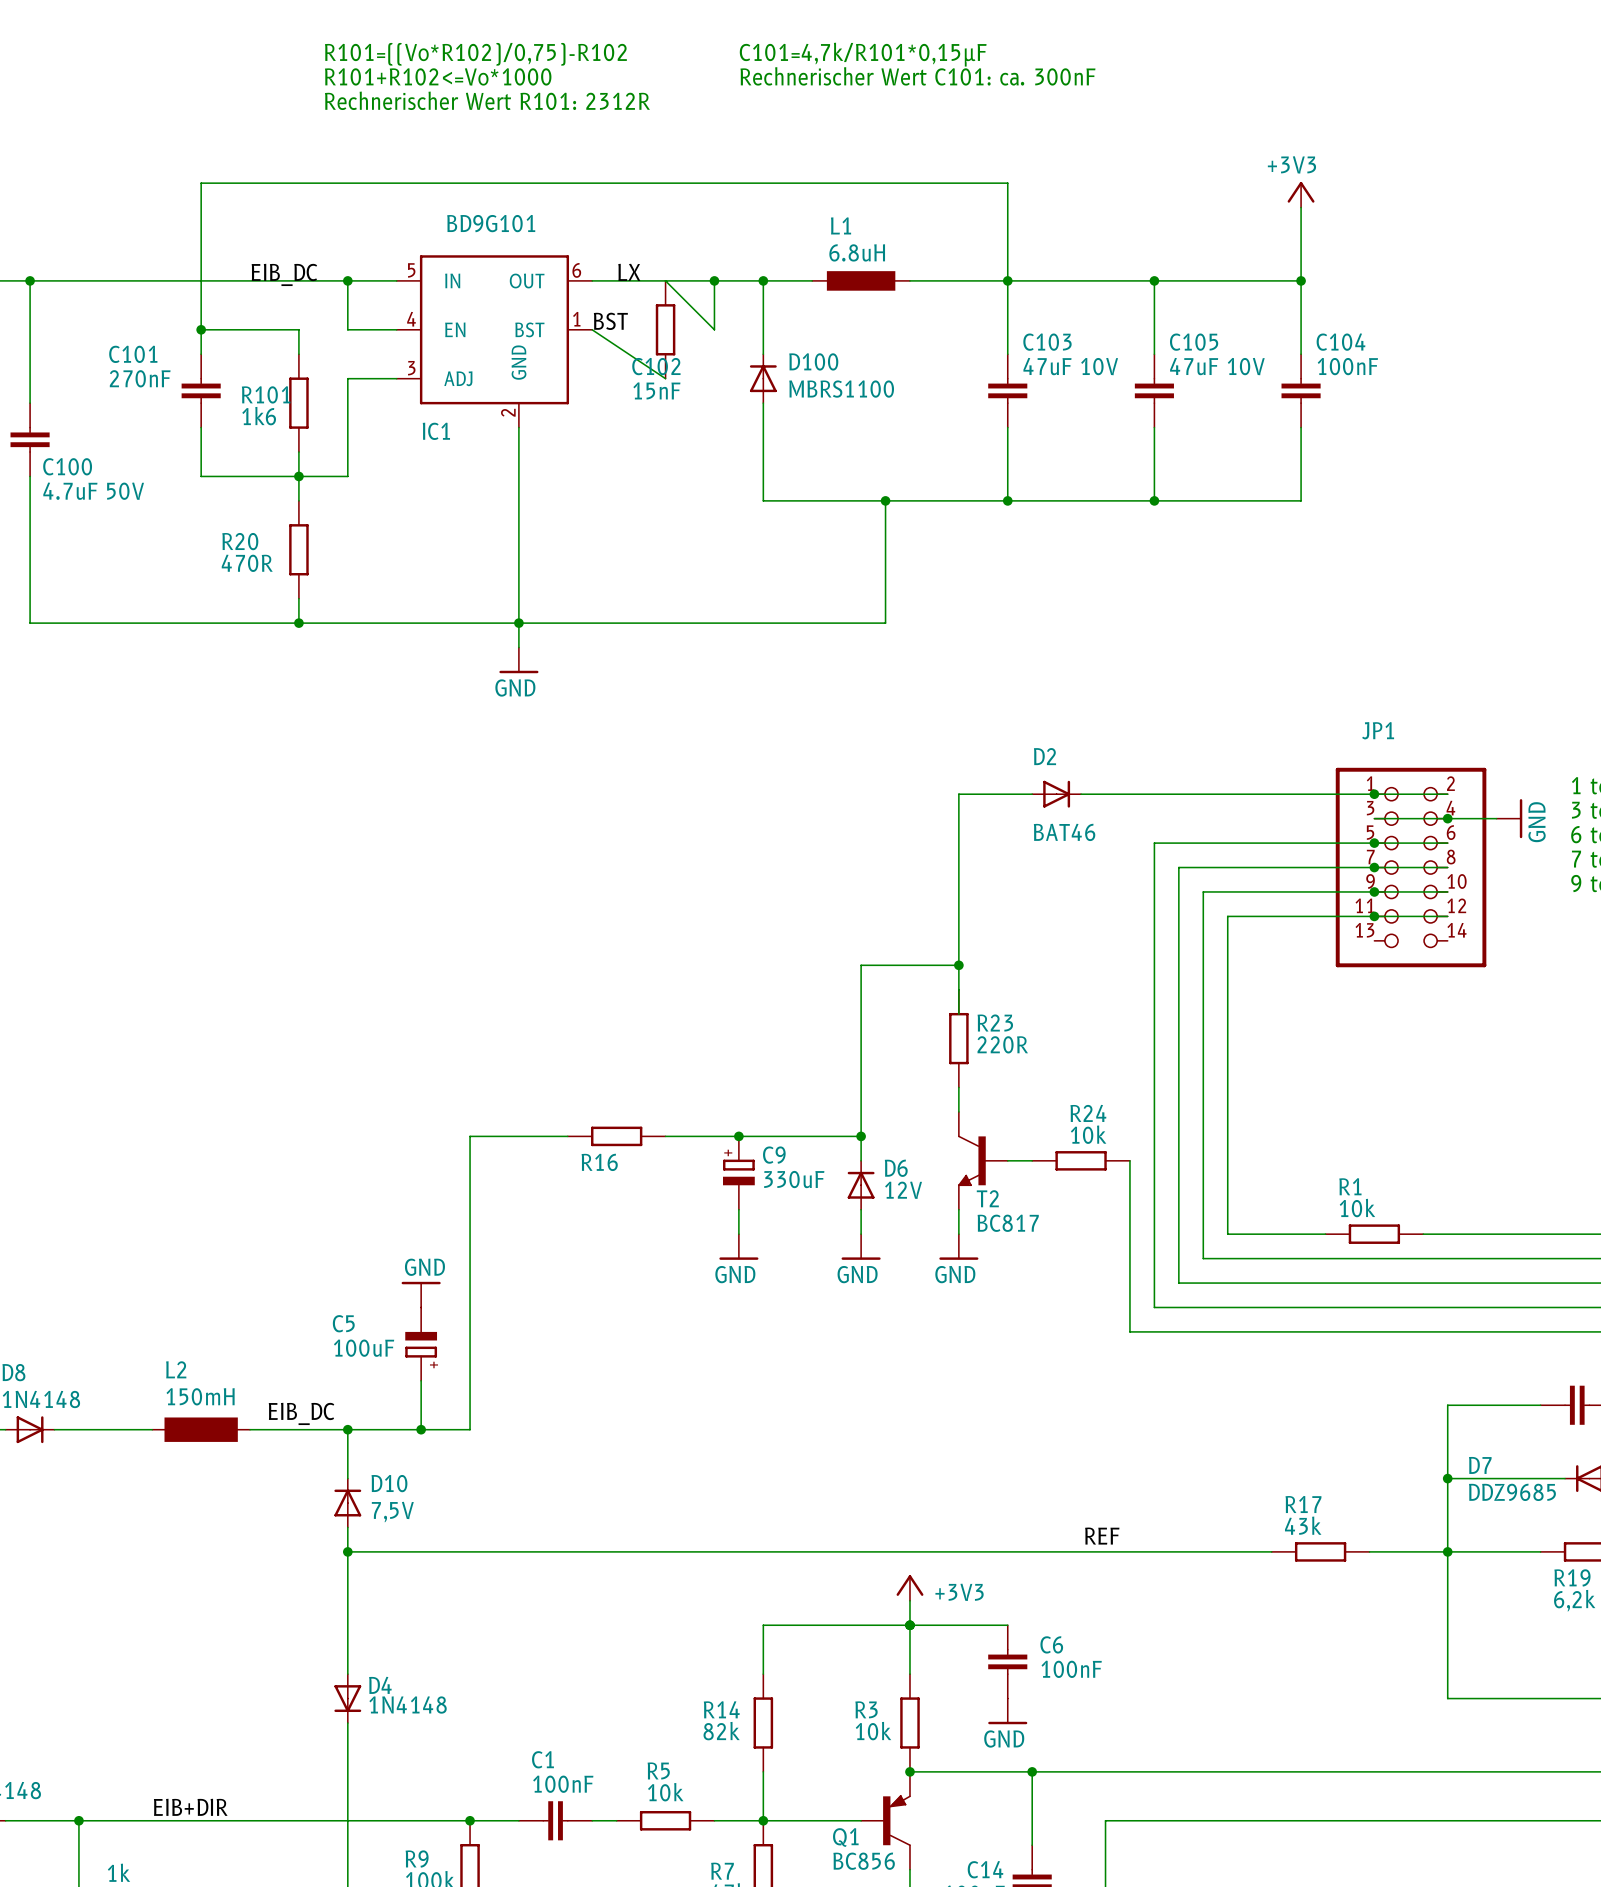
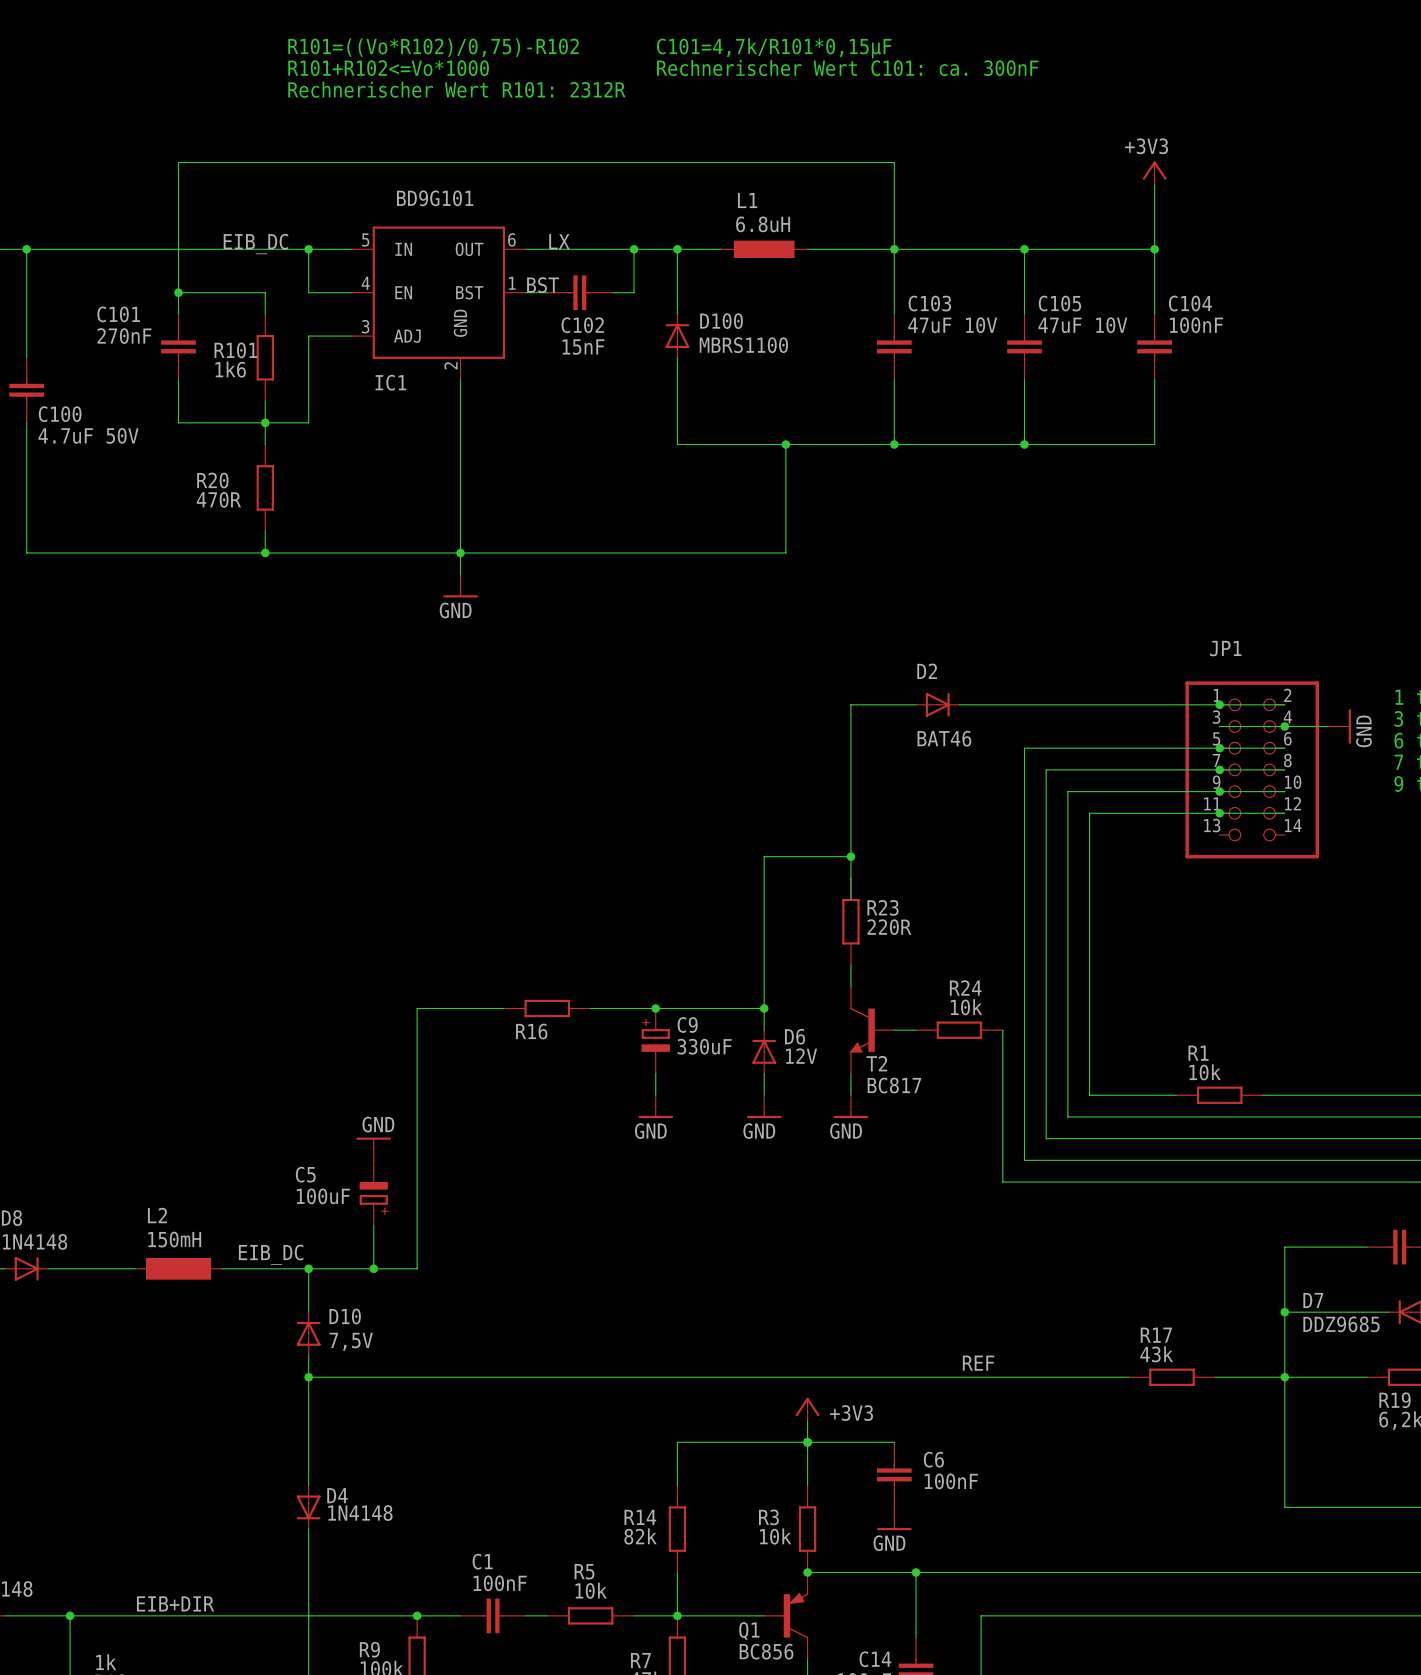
C102 symbol: [655, 280, 676, 379] -> [547, 275, 613, 311]
wire: (665, 280) (714, 329) -> (612, 292) (634, 292)
wire: (592, 329) (665, 378) -> (525, 292) (547, 292)

